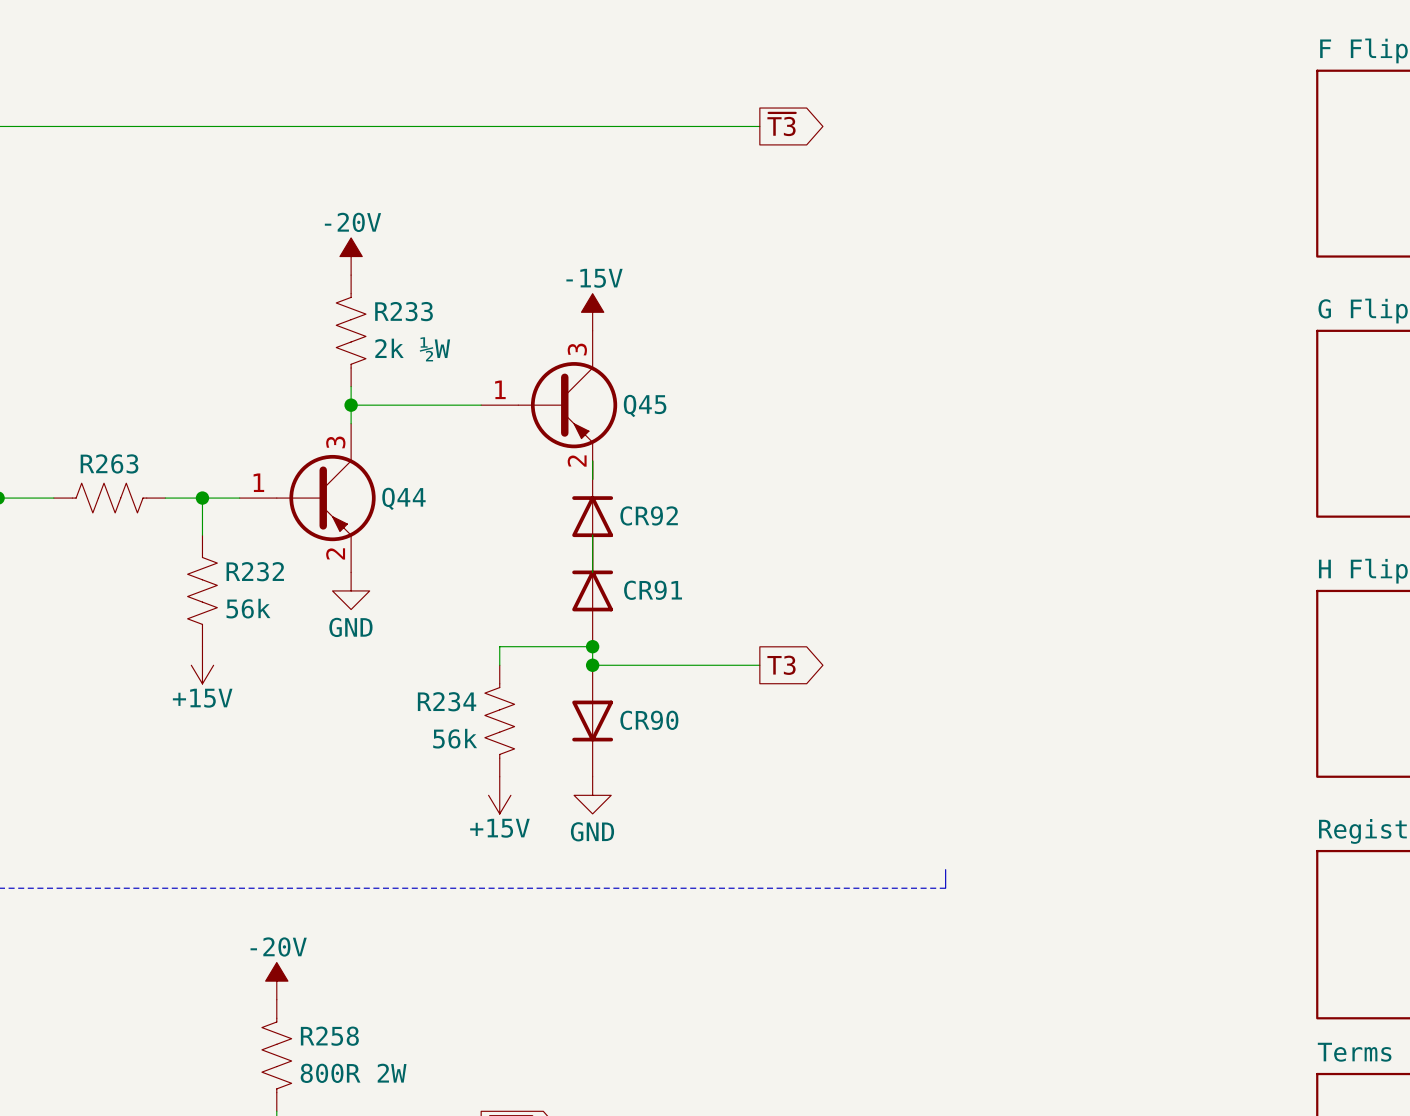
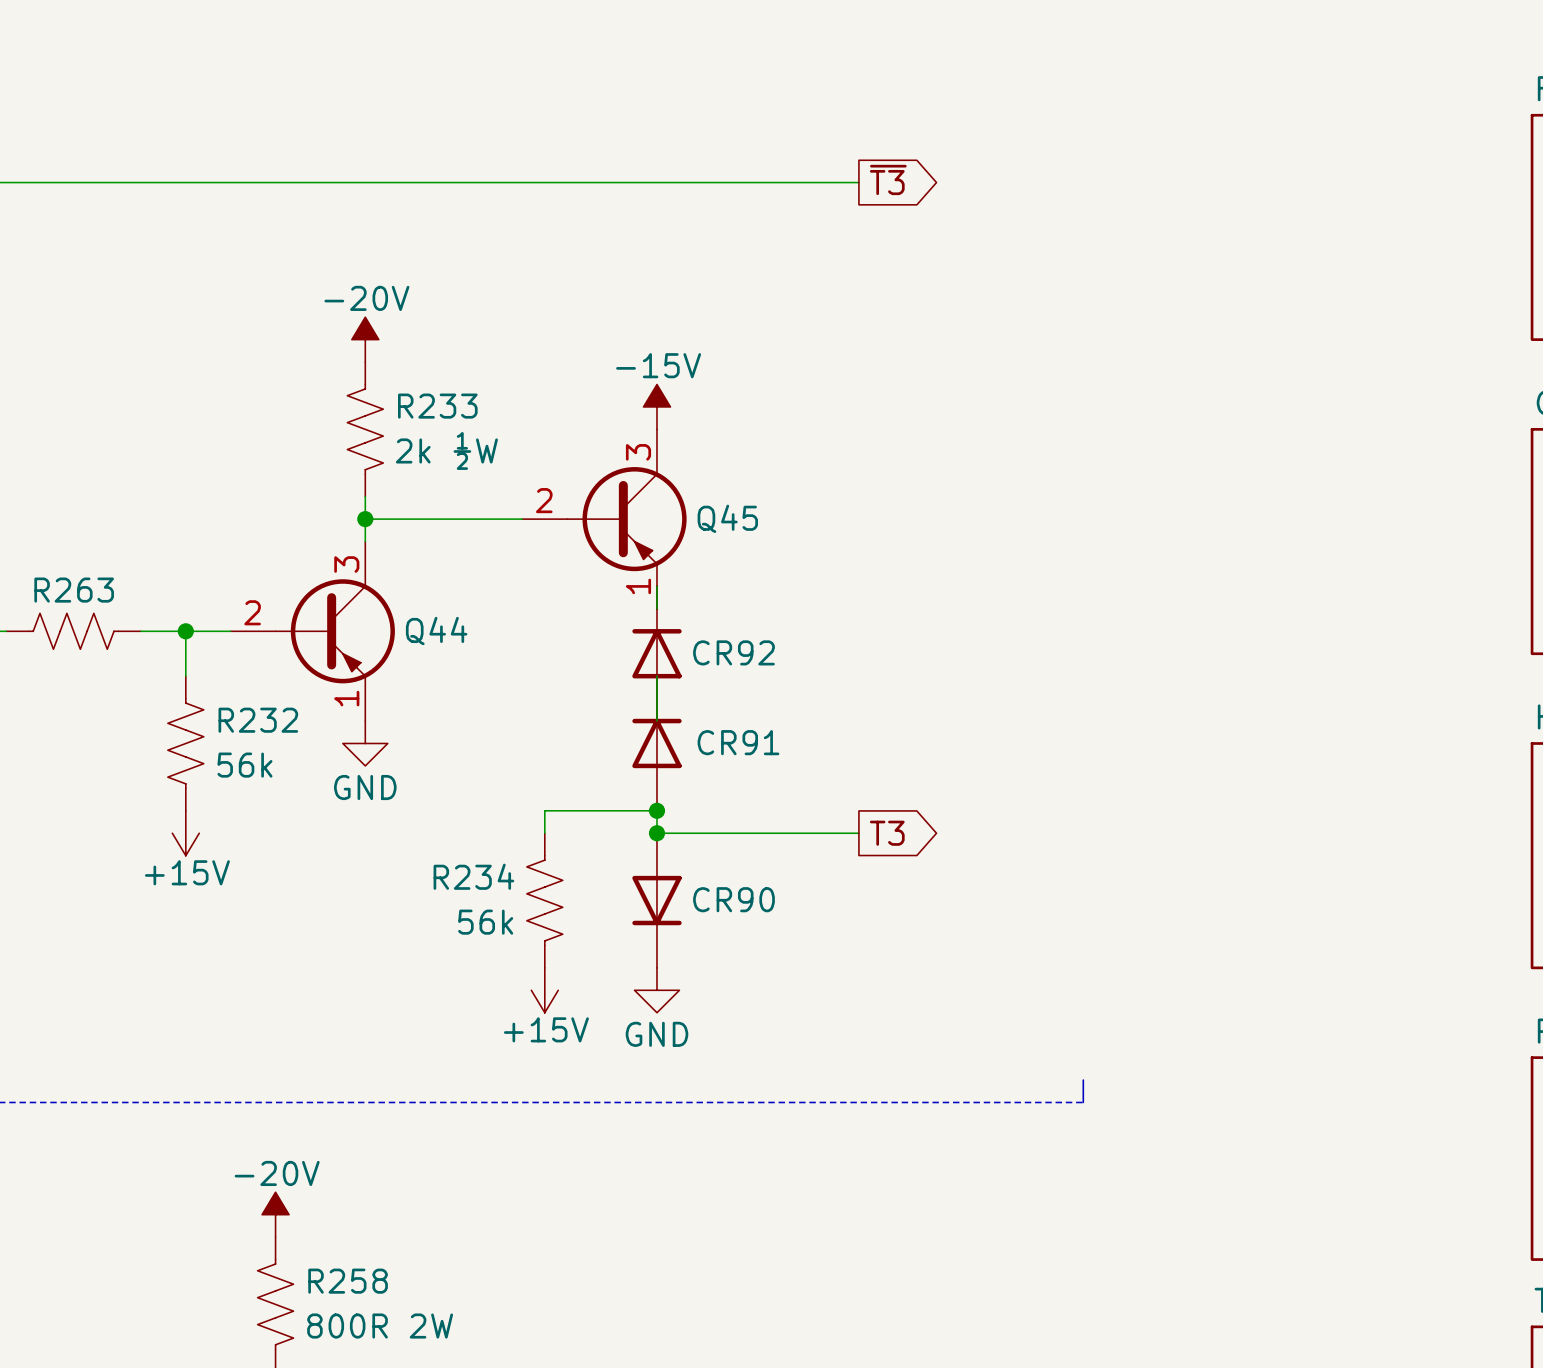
Q45 pin number: 1 (500, 389) -> 2 (544, 500)
Q45 pin number: 2 (577, 461) -> 1 (638, 586)
Q44 pin number: 1 (258, 482) -> 2 (252, 612)
Q44 pin number: 2 (335, 553) -> 1 (346, 698)

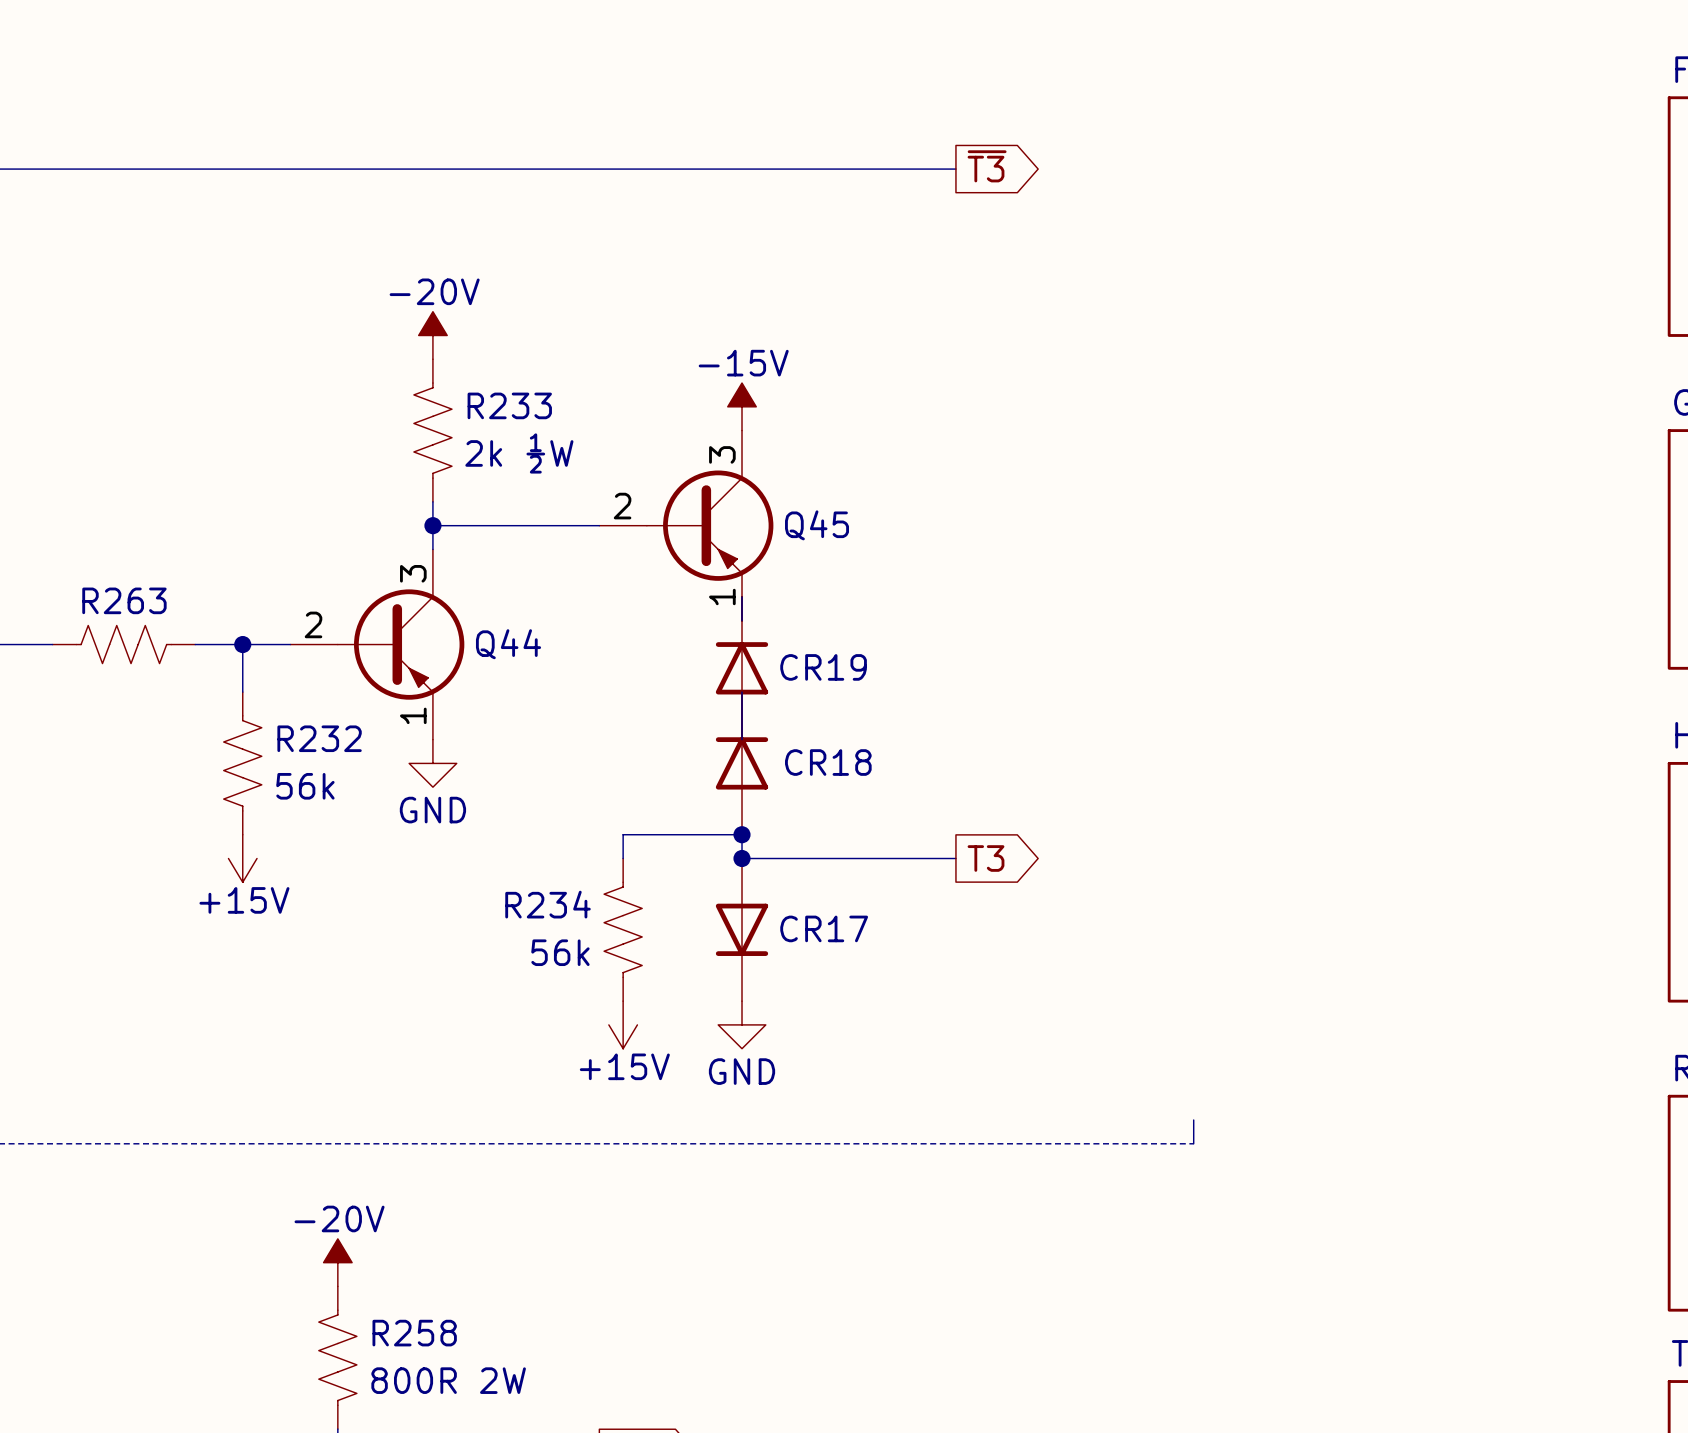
CR92 name: CR92 (733, 652) -> CR19 (823, 667)
CR91 name: CR91 (738, 742) -> CR18 (828, 762)
CR90 name: CR90 (733, 899) -> CR17 (824, 928)

